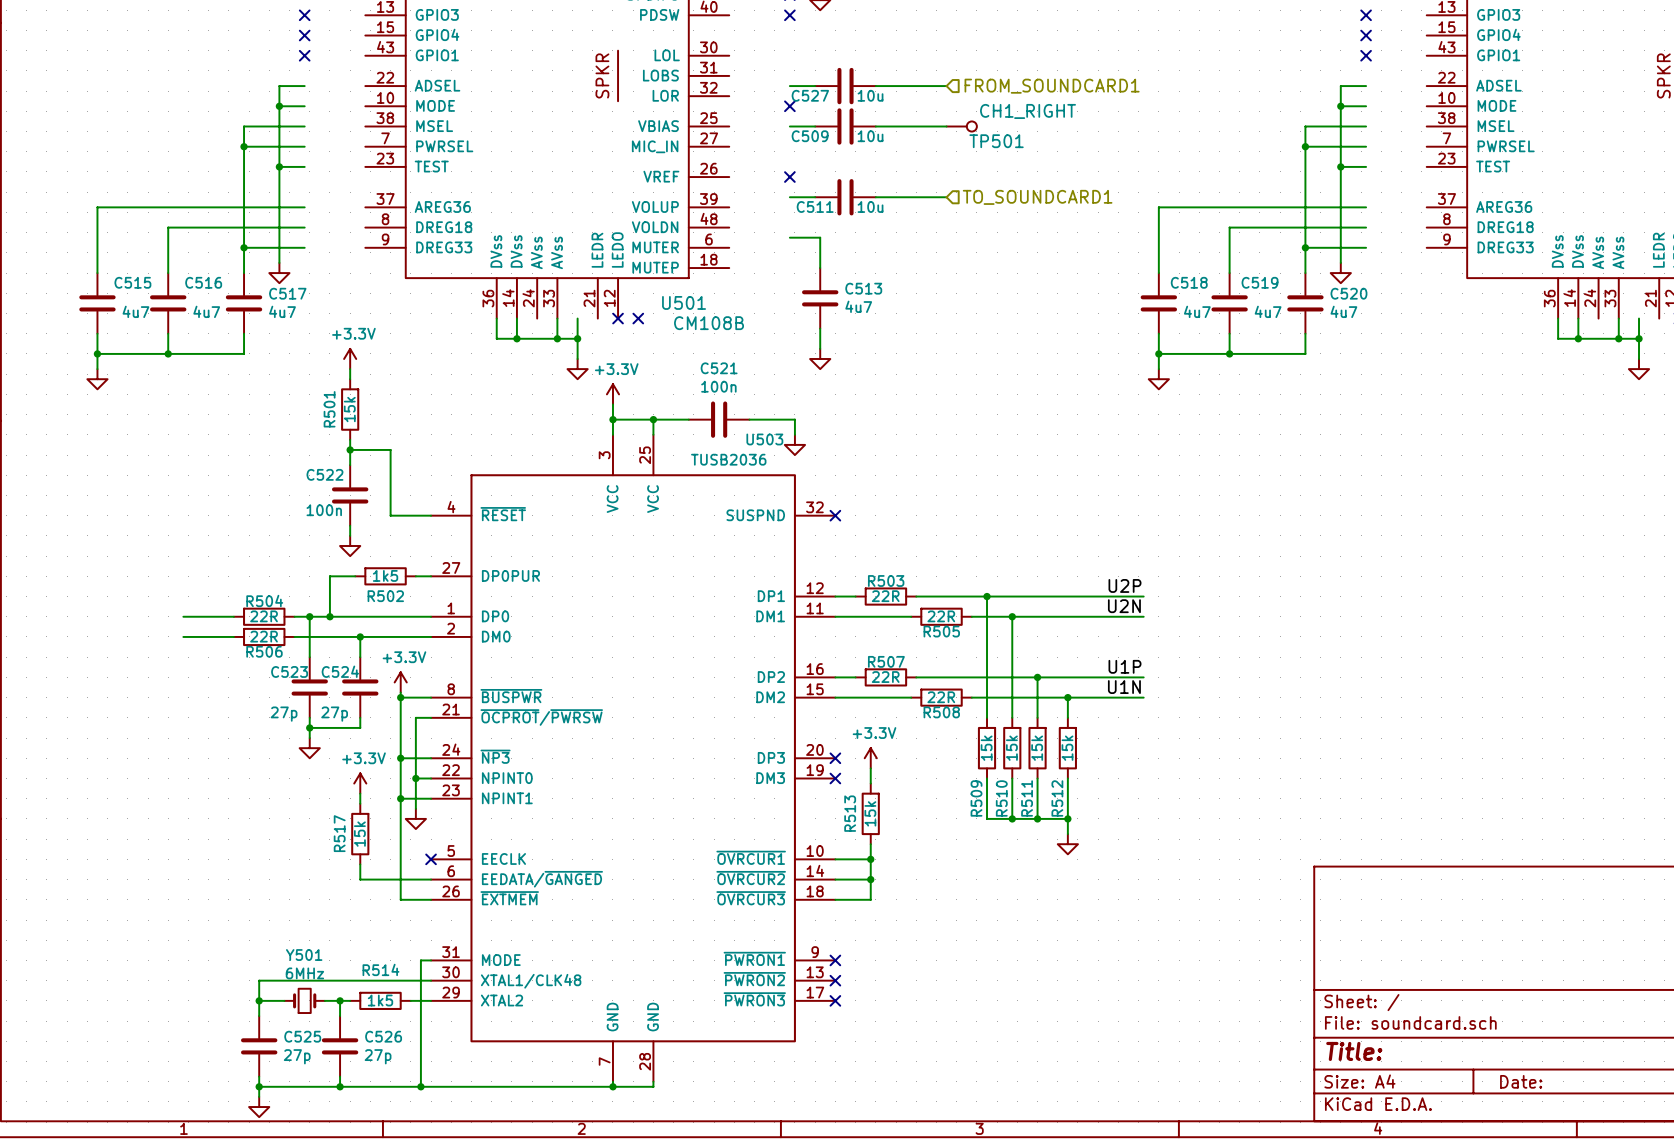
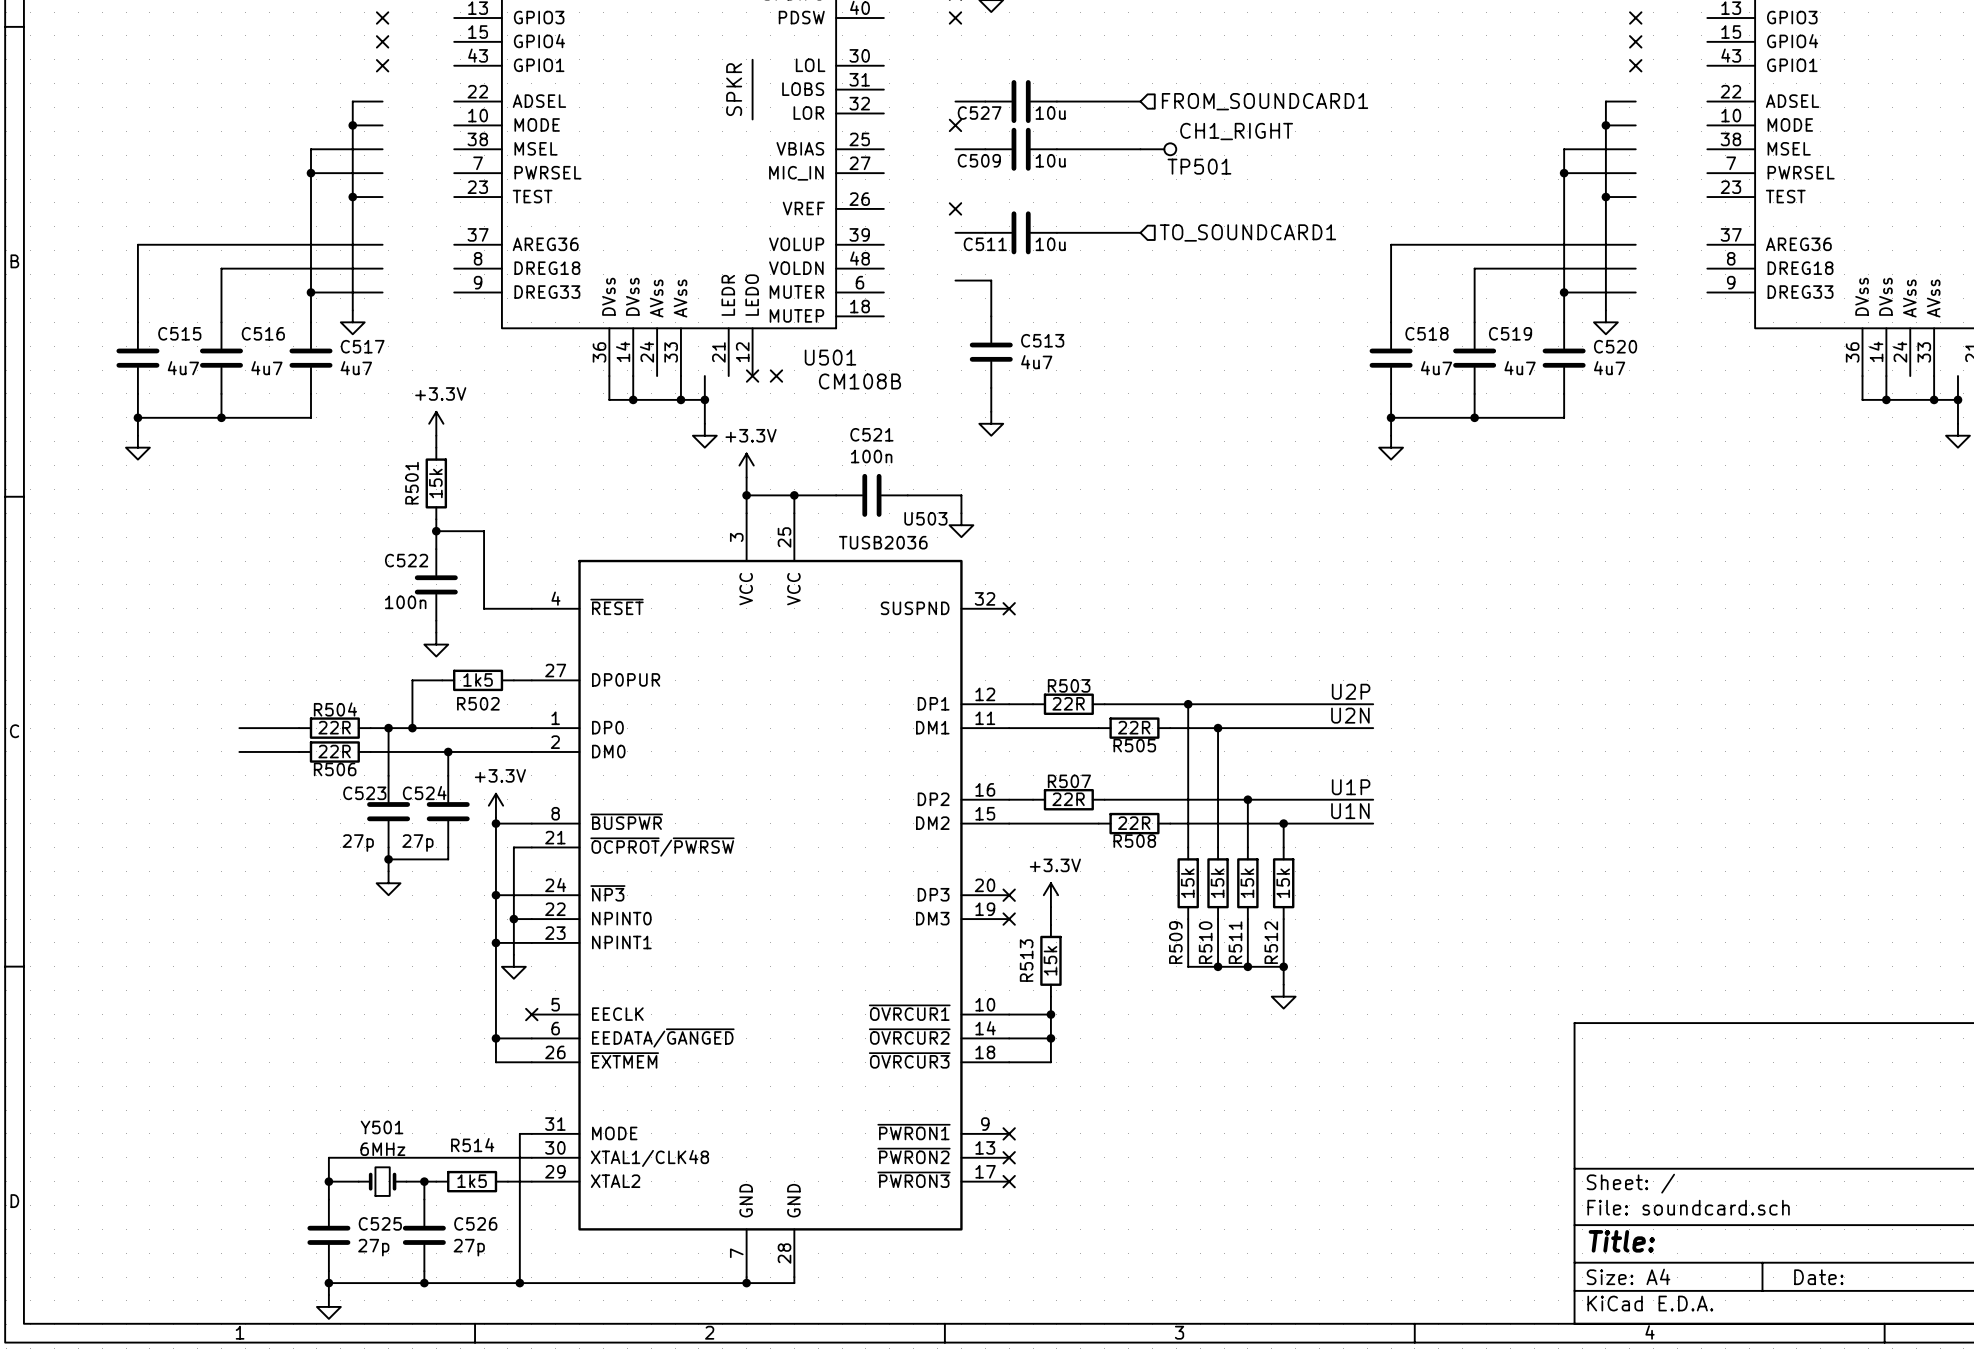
power symbol: +3.3V (360, 783) -> none
wire: (360, 793) (360, 803) -> none
R517: 15k (360, 834) -> none
wire: (360, 864) (360, 879) (400, 879) -> none
junction: none -> (495, 1038)

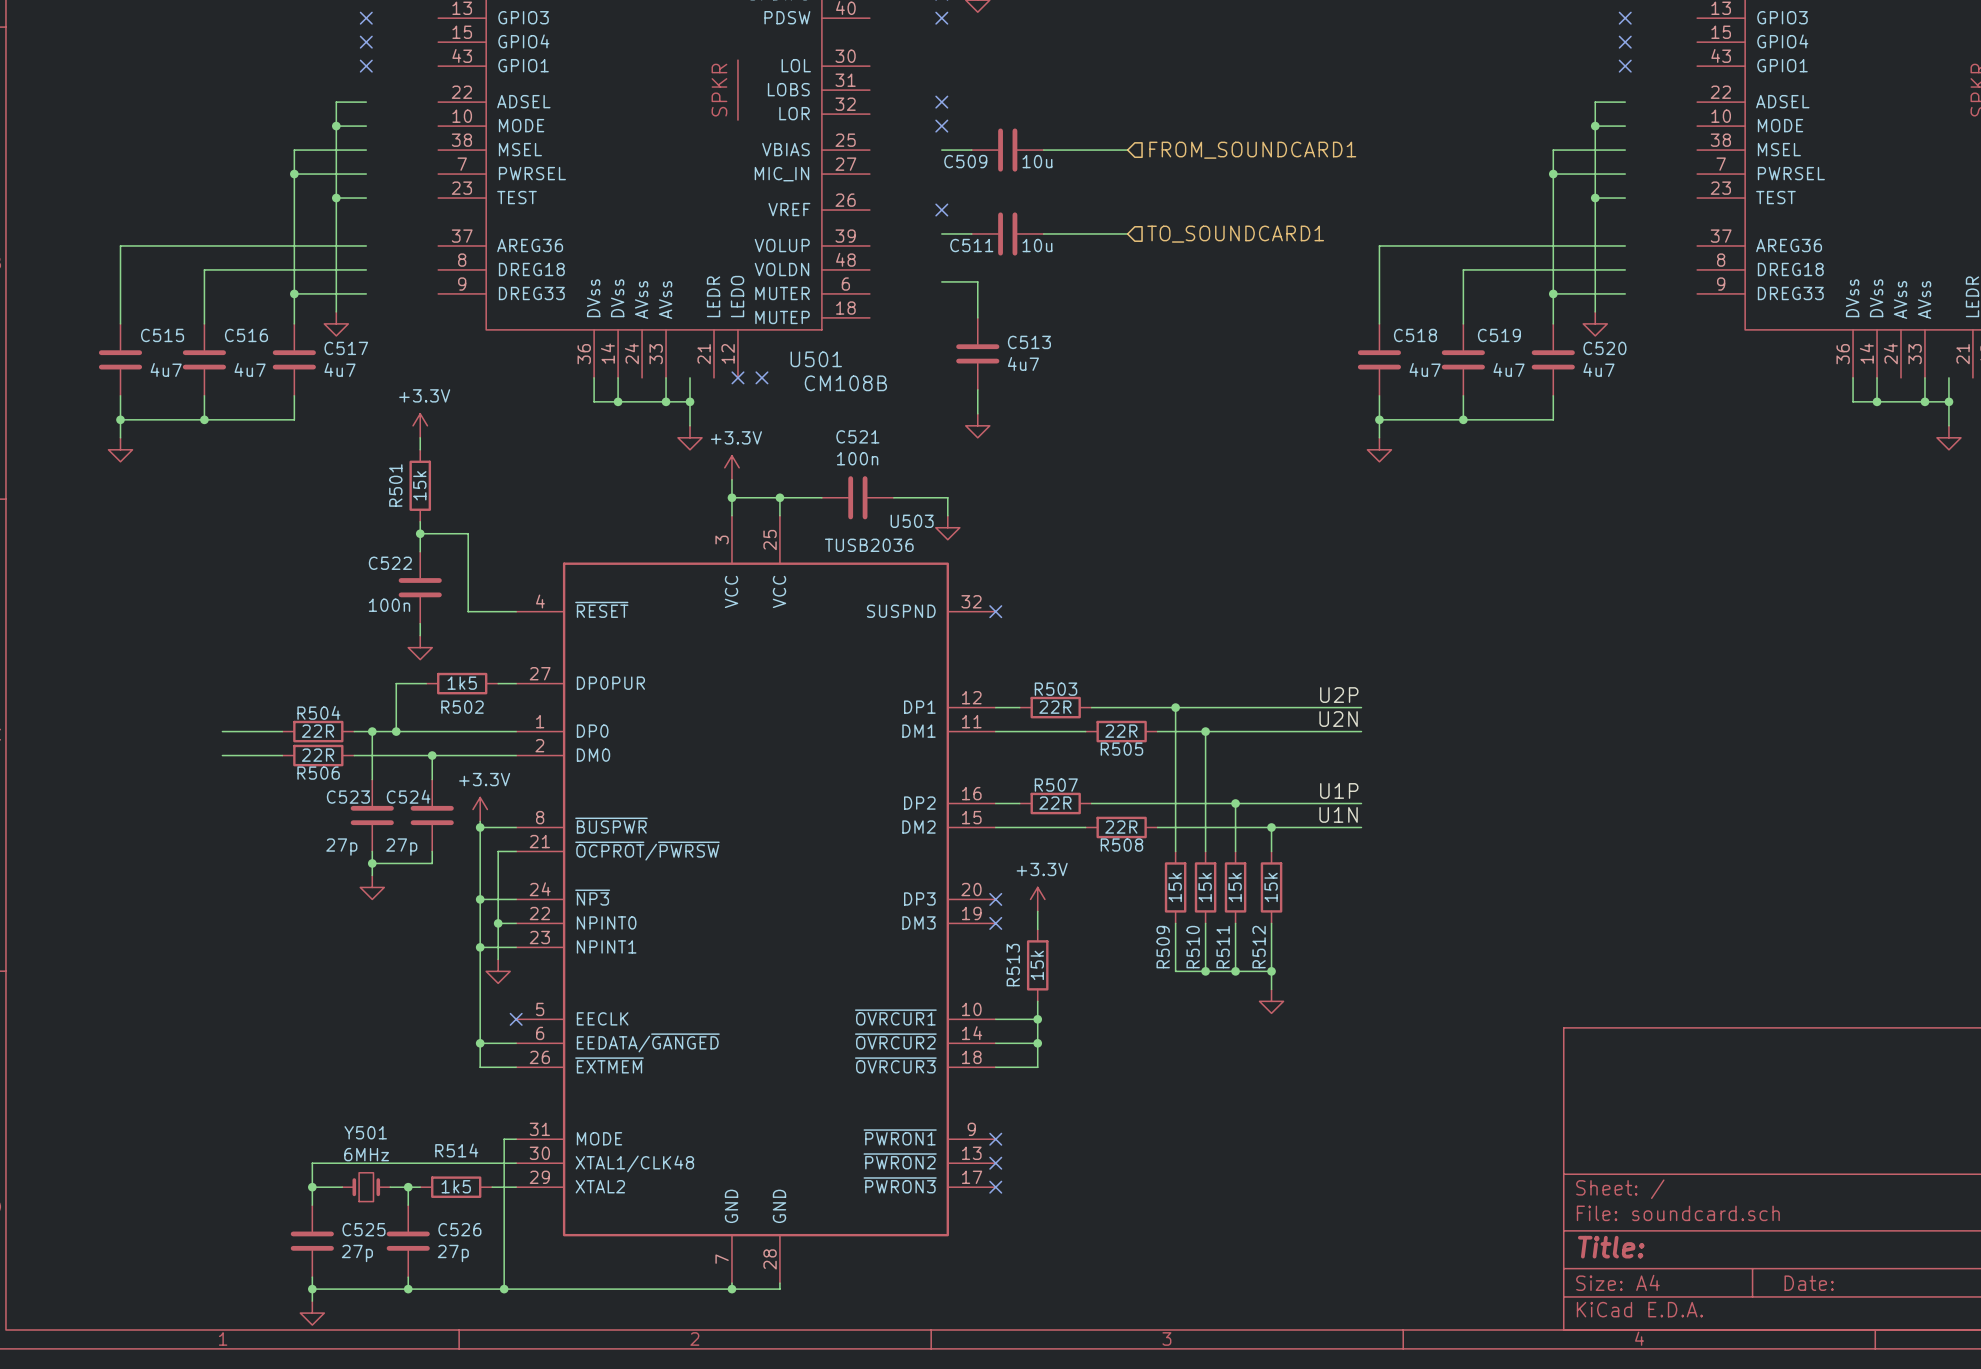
wire: (955, 101) (985, 101) -> none
no-connect mark: none -> (941, 102)
C527: 10u (1021, 101) -> none
wire: (1056, 101) (1140, 101) -> none
hierarchical label position: FROM_SOUNDCARD1 (1265, 101) -> FROM_SOUNDCARD1 (1252, 150)
TP501: CH1_RIGHT (1158, 149) -> none

